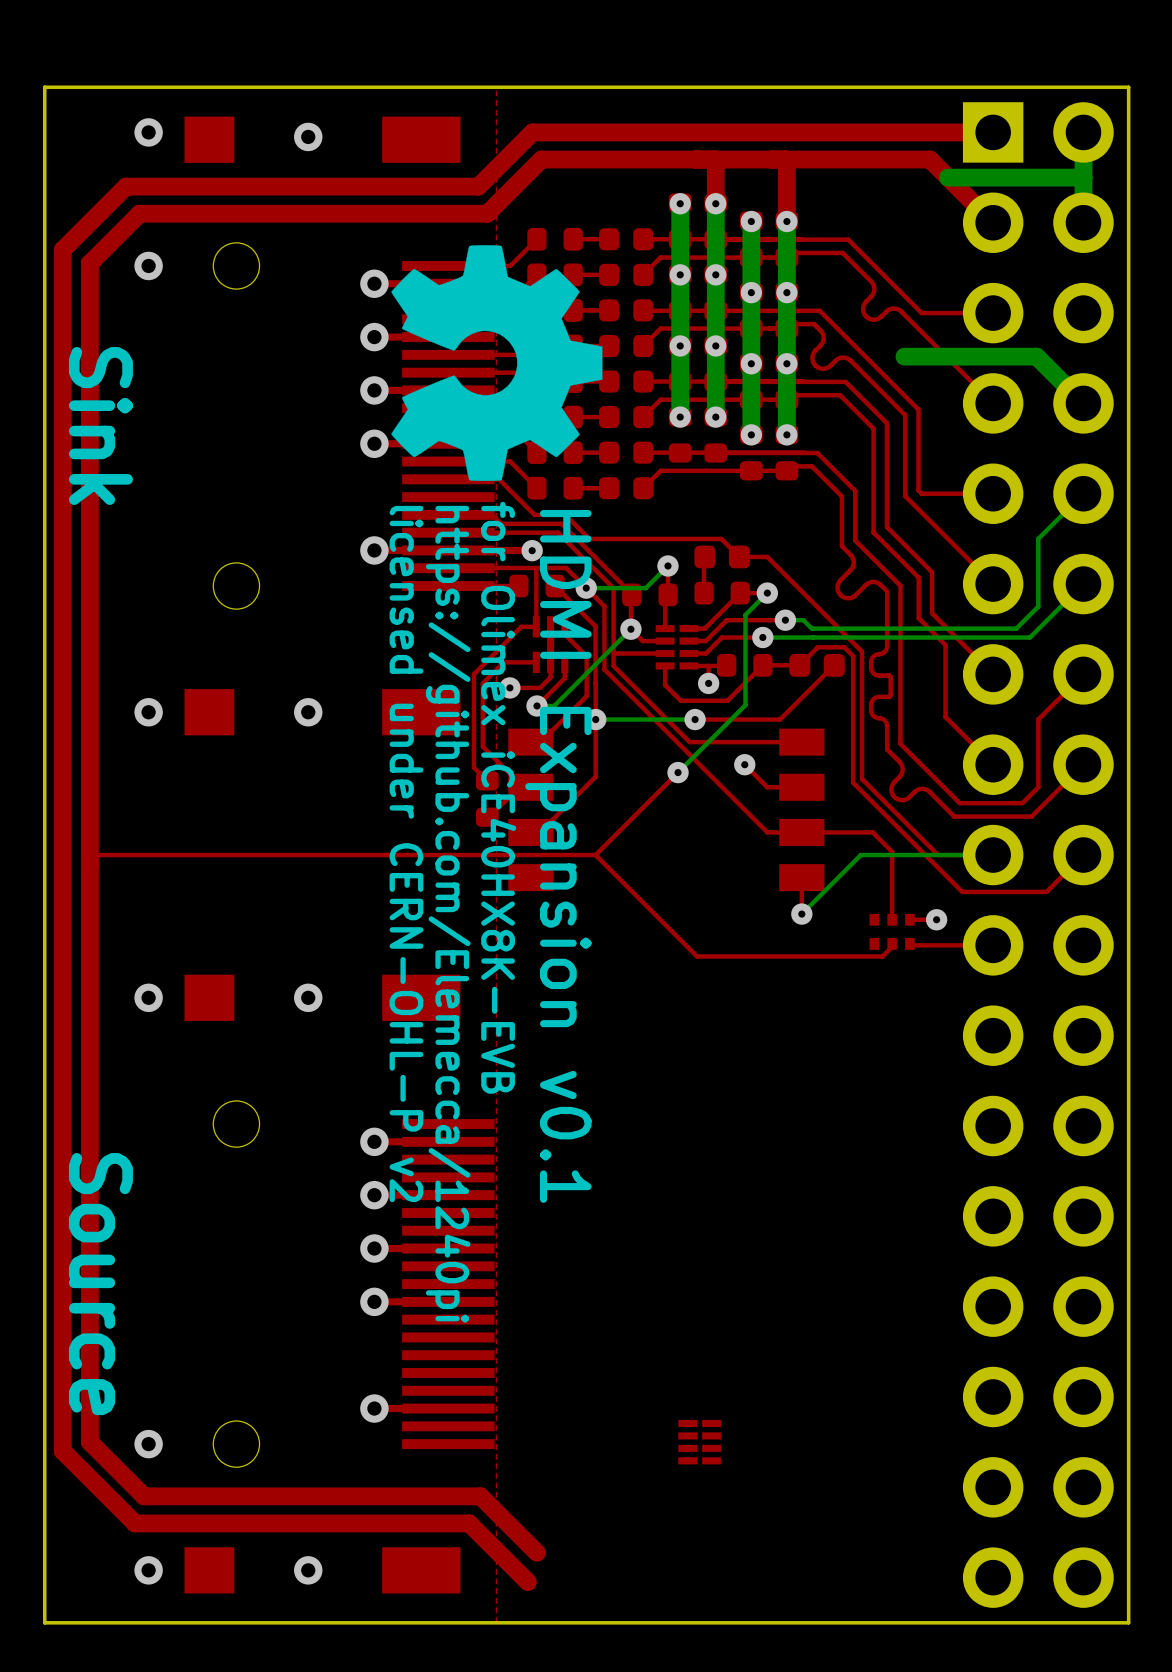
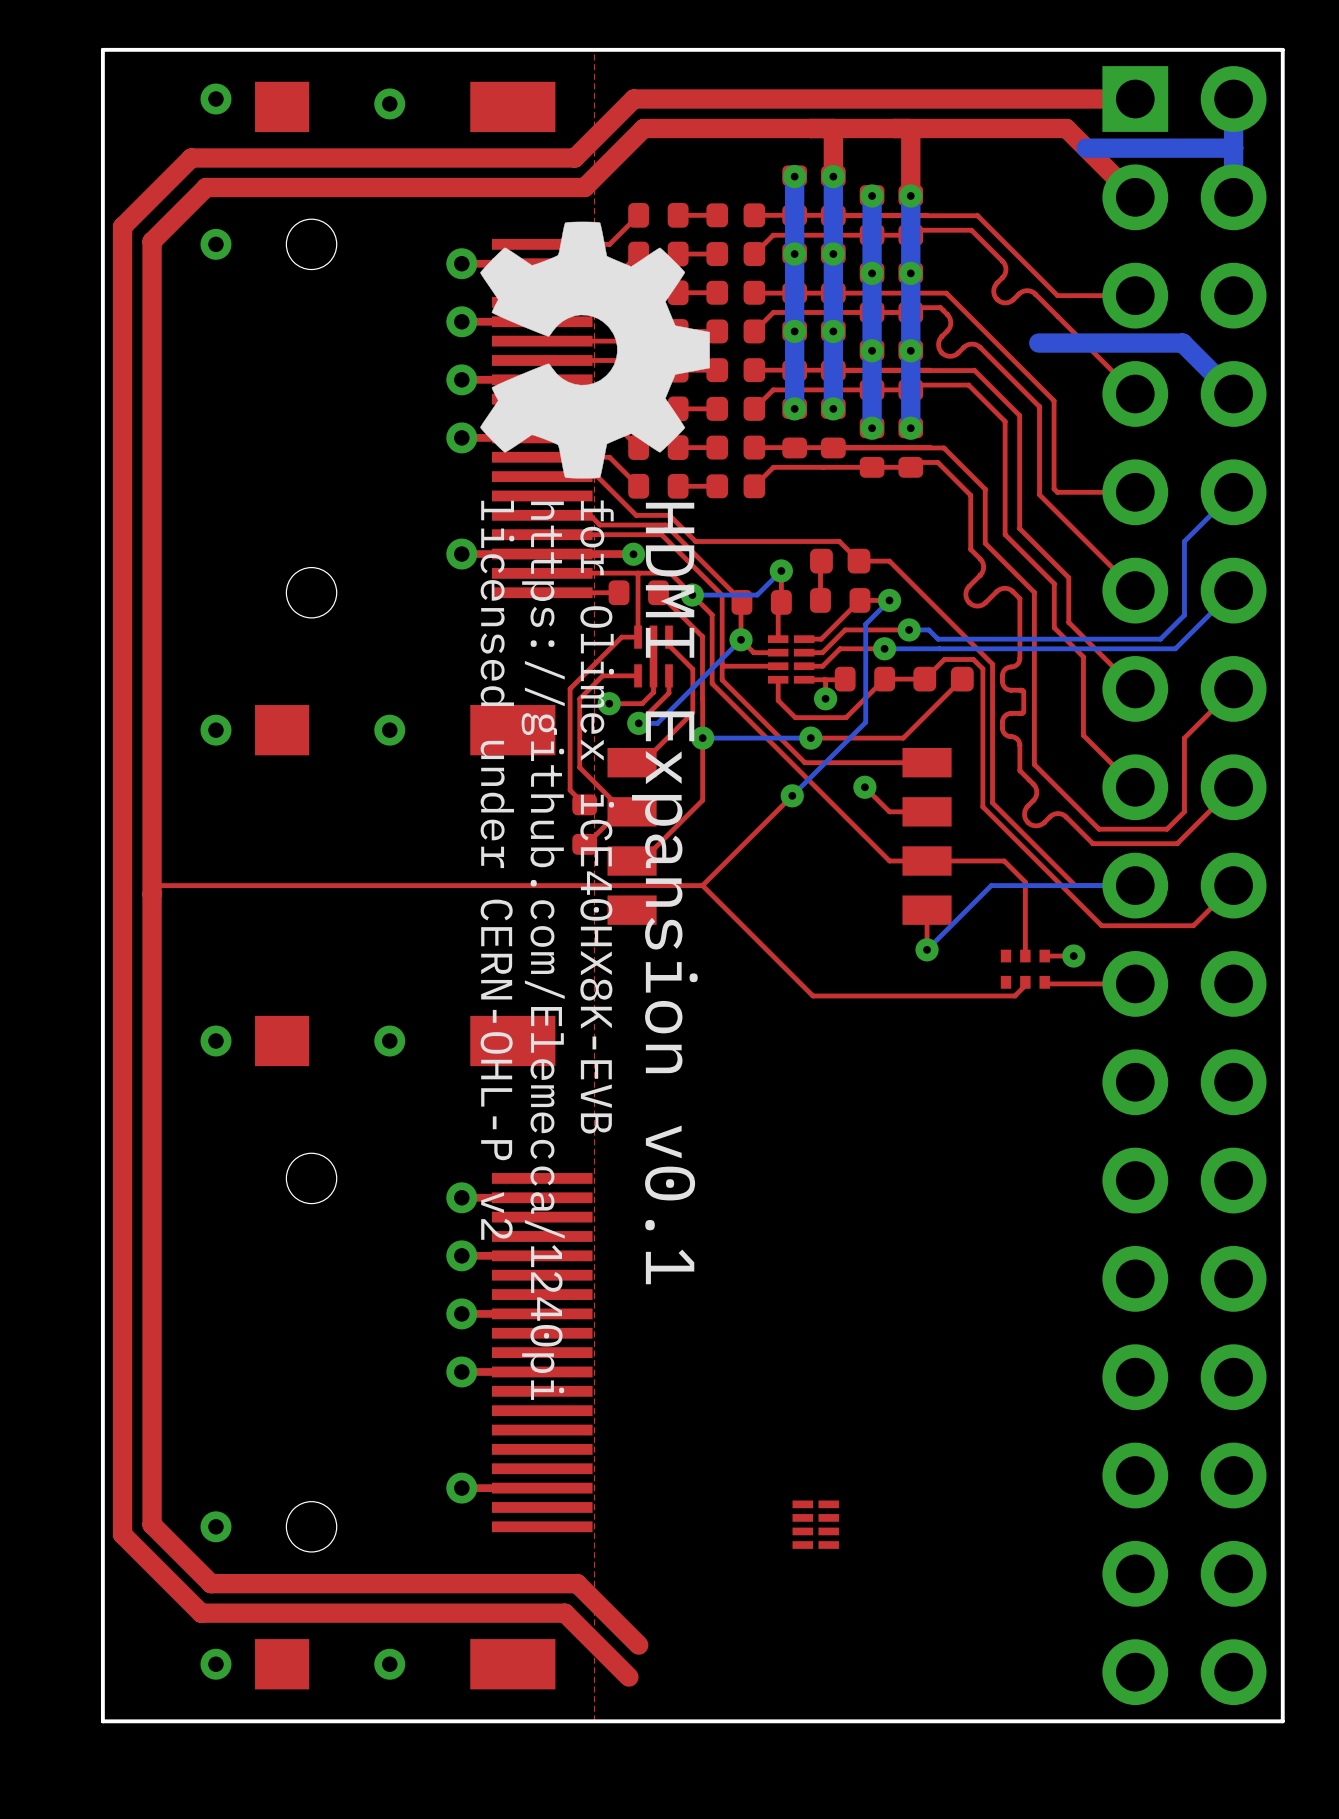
text: Sink (100, 425) -> none
text: Source (100, 1284) -> none

